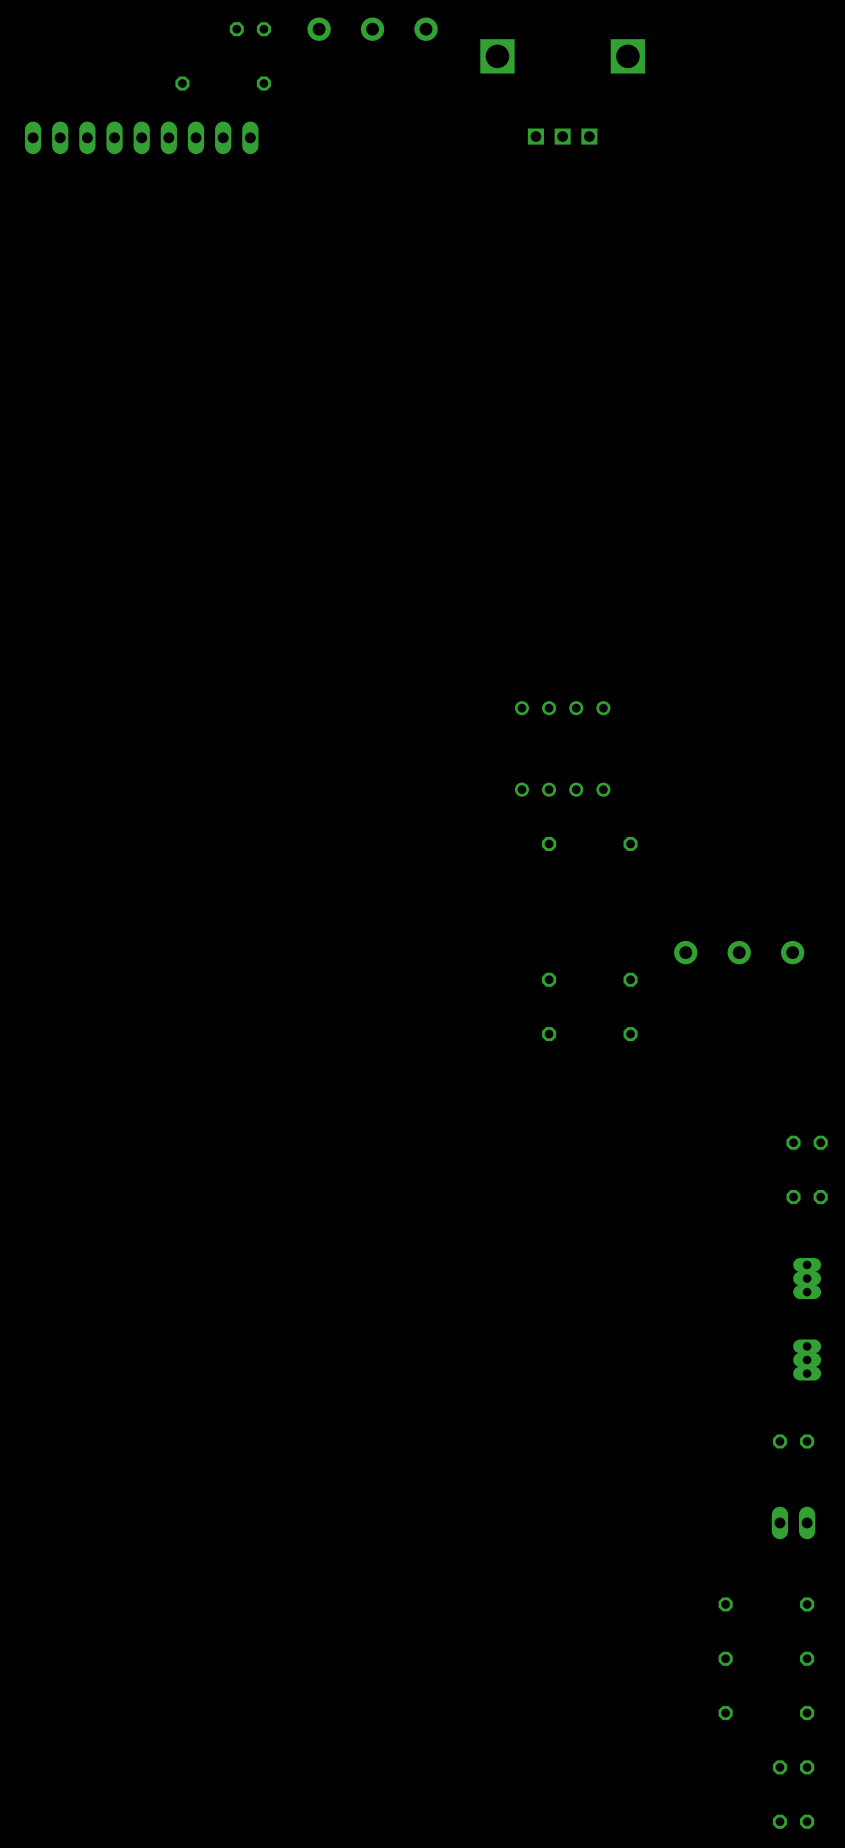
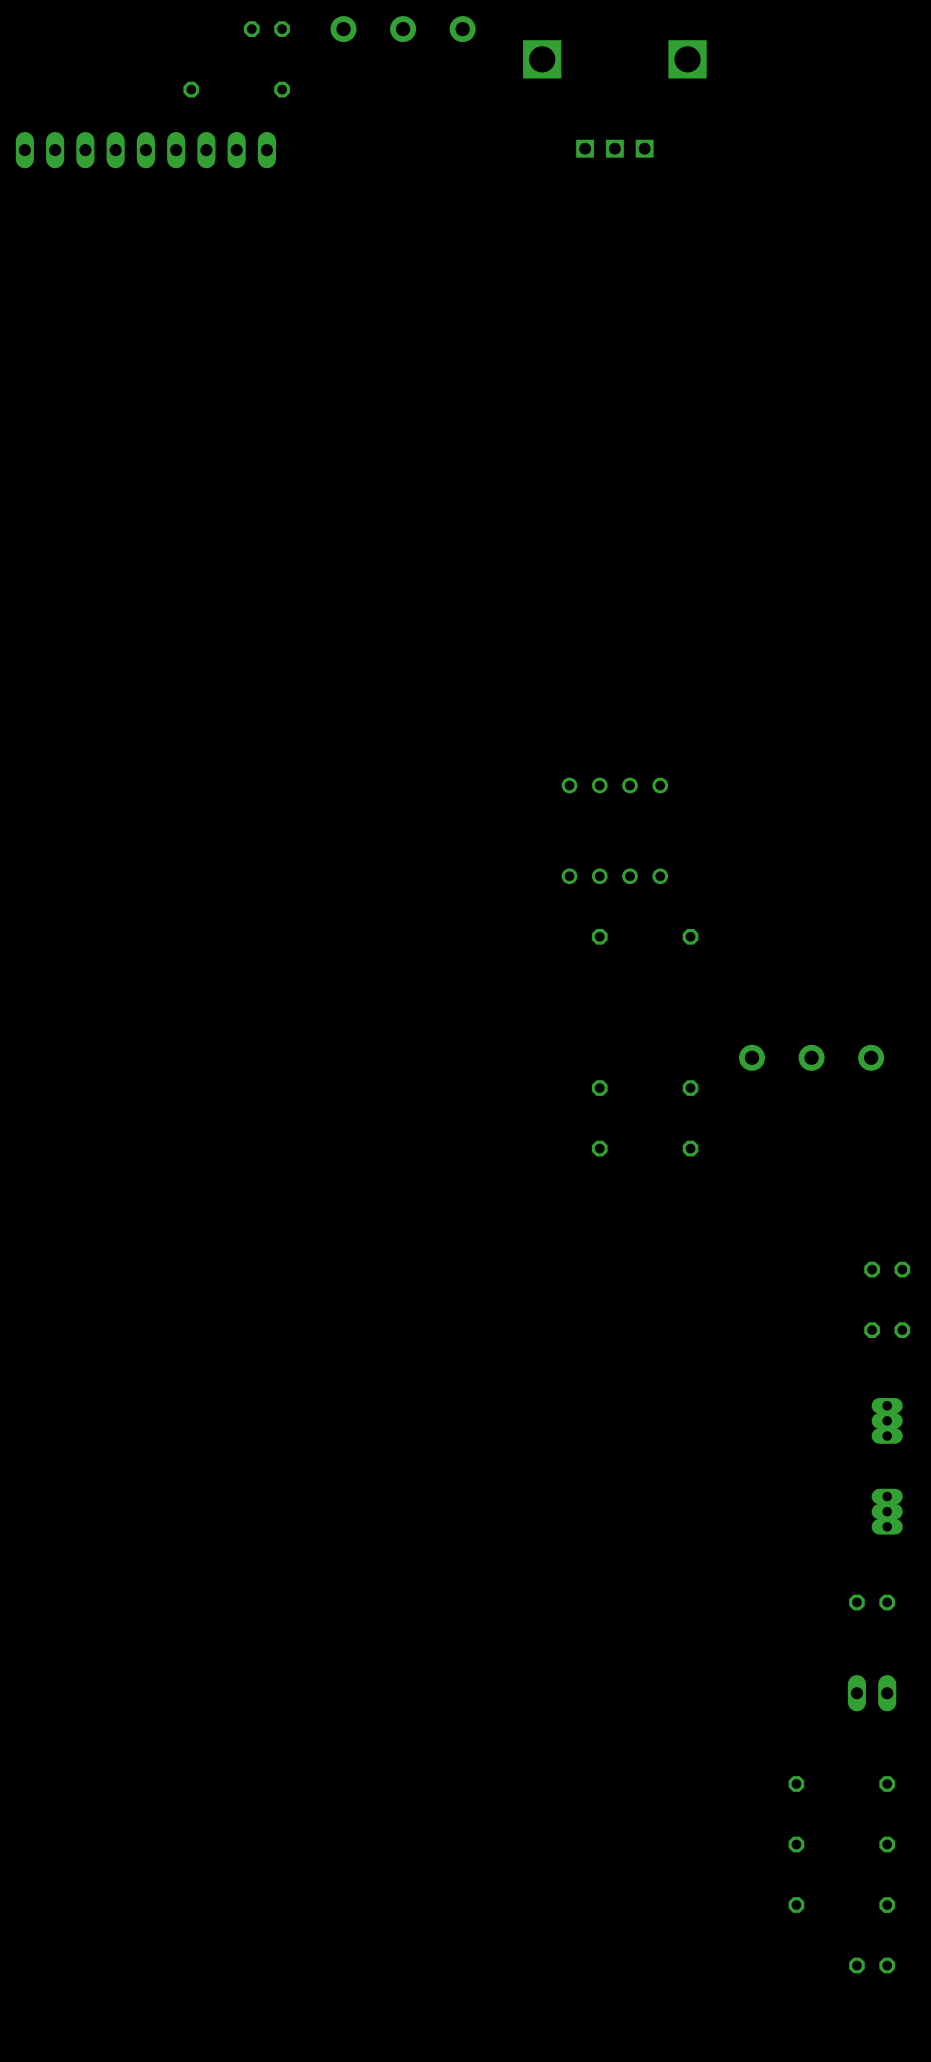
part: (793, 1821) -> none

